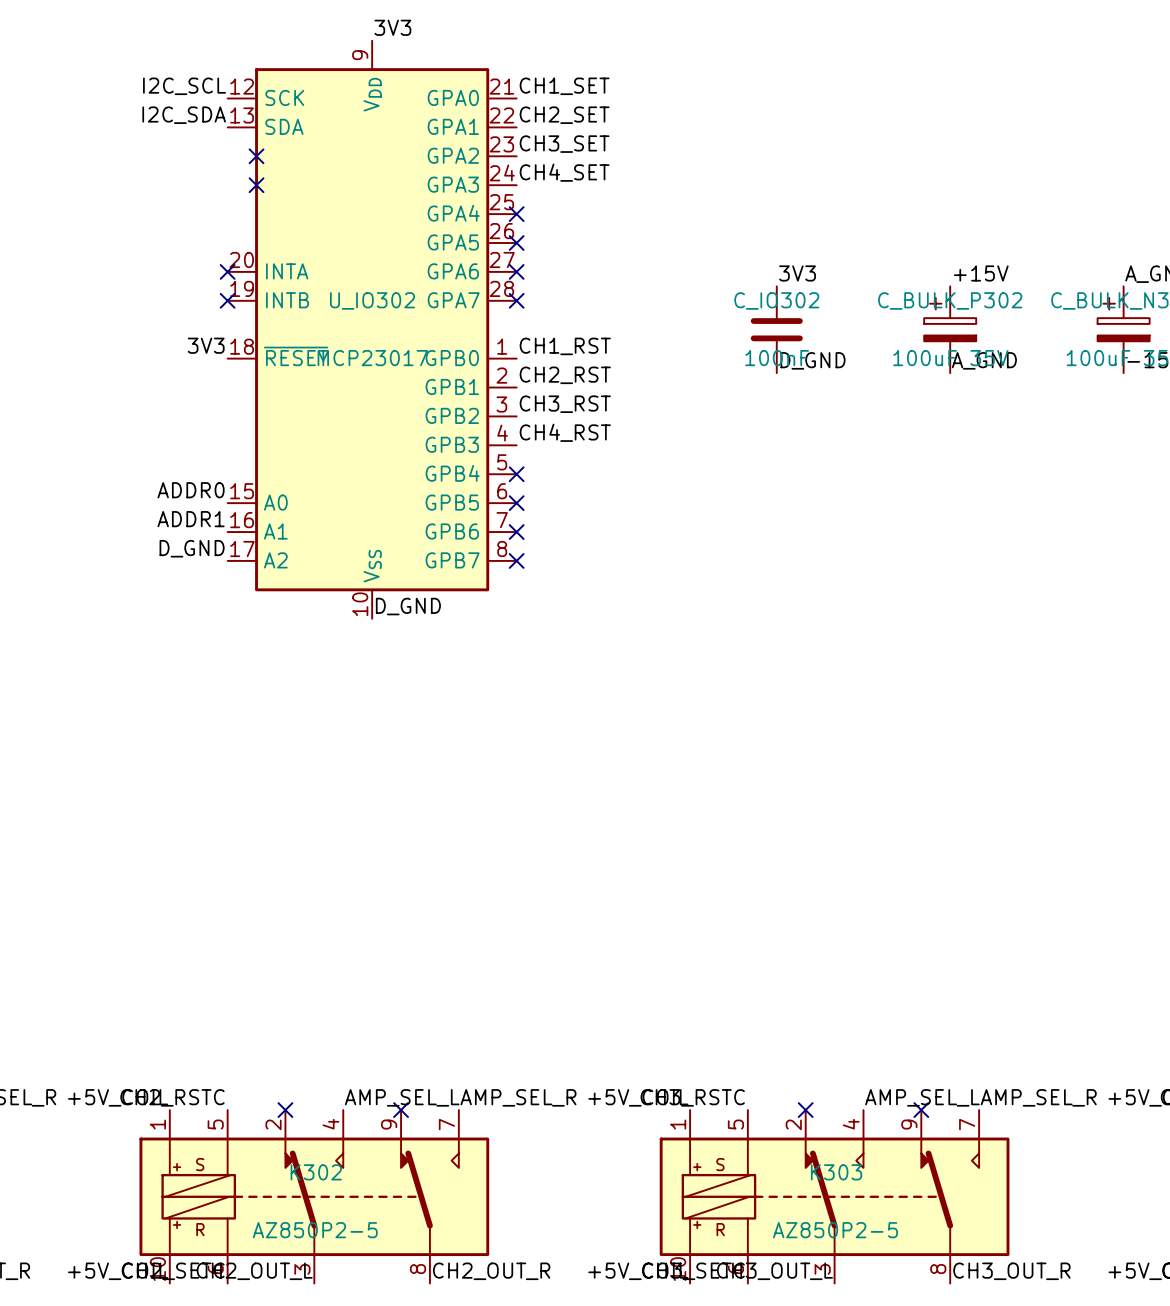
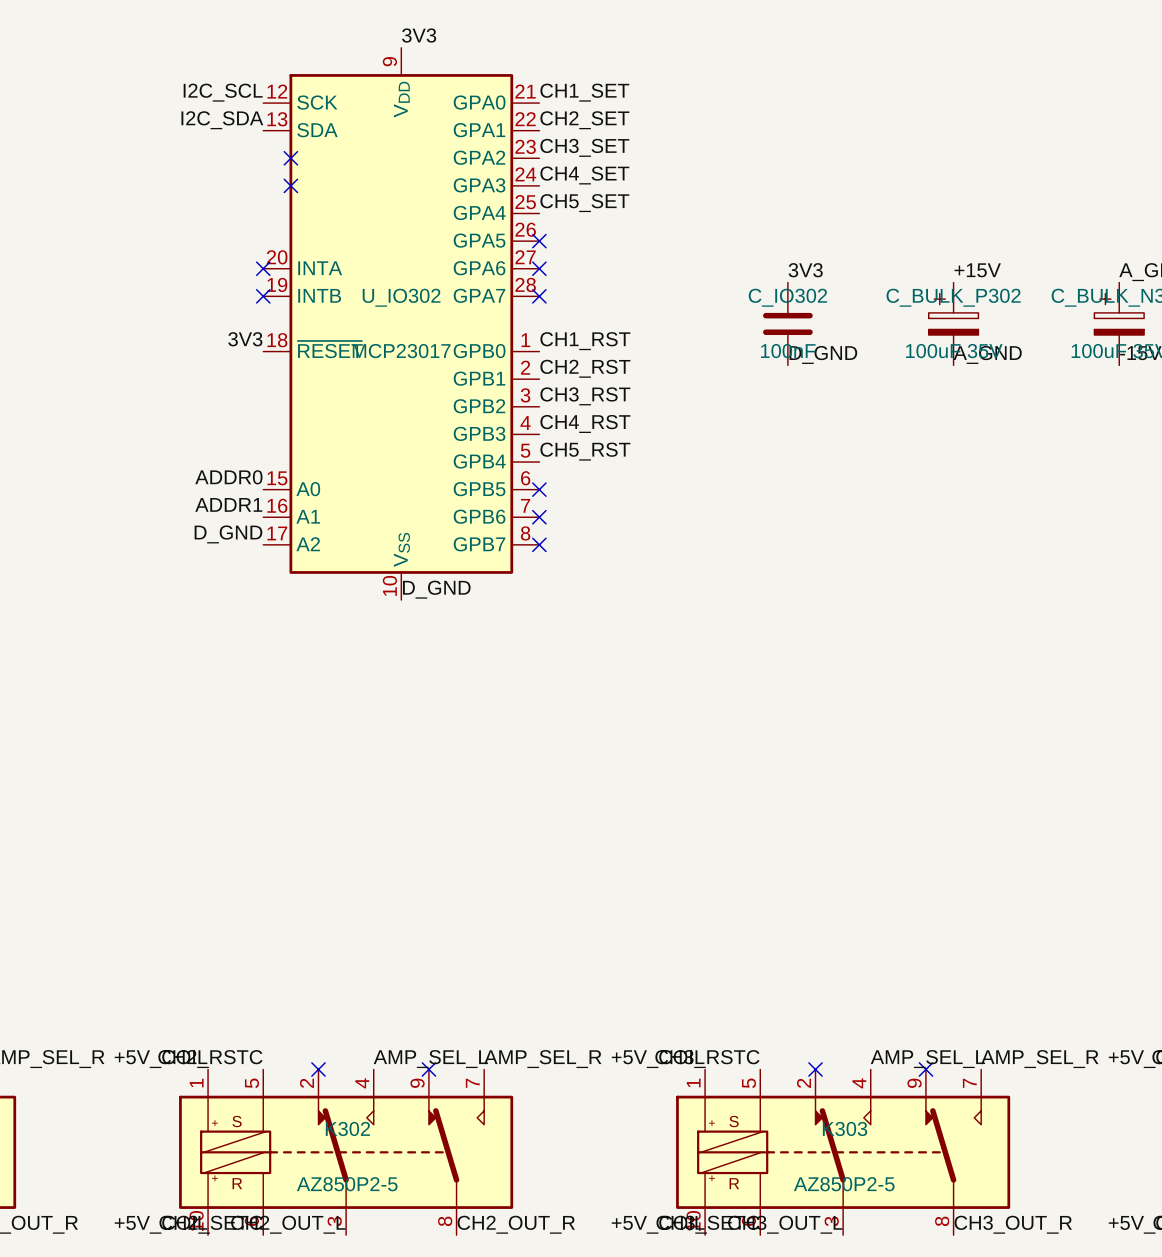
label: none -> CH5_SET (584, 203)
no-connect mark: (516, 214) -> none
label: none -> CH5_RST (585, 451)
no-connect mark: (516, 474) -> none

